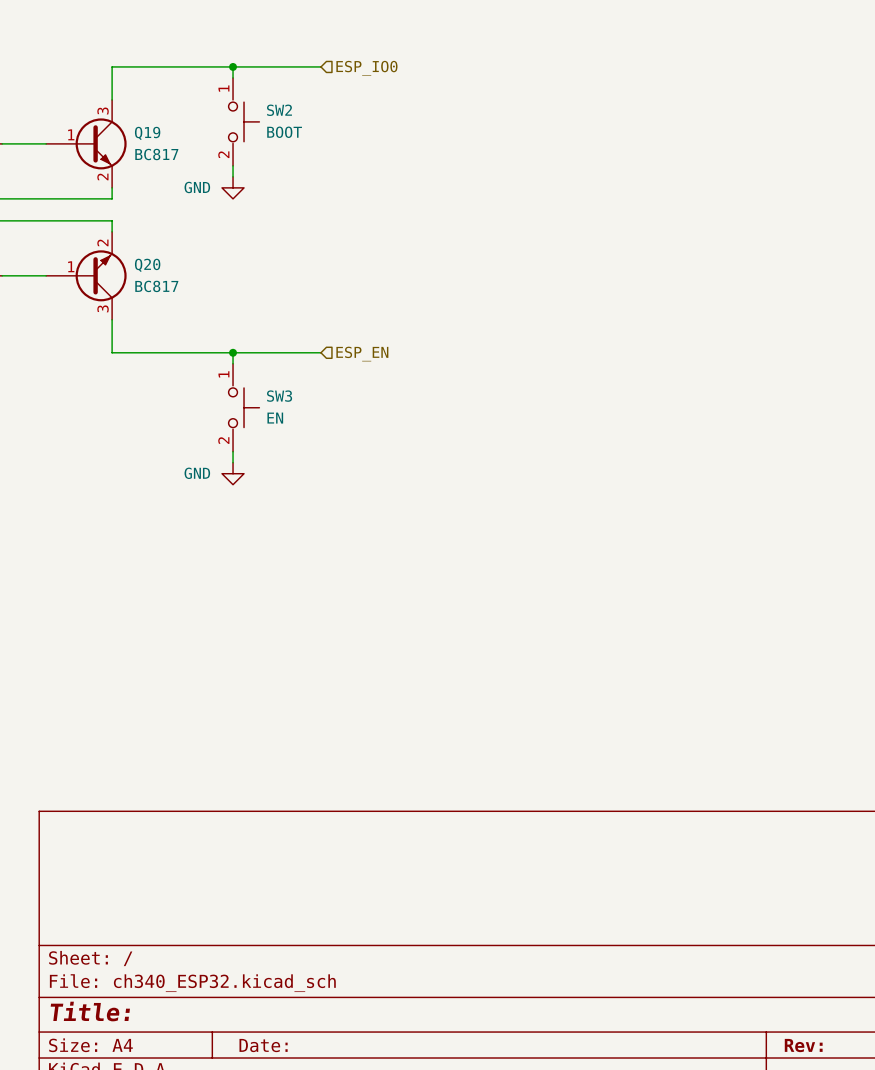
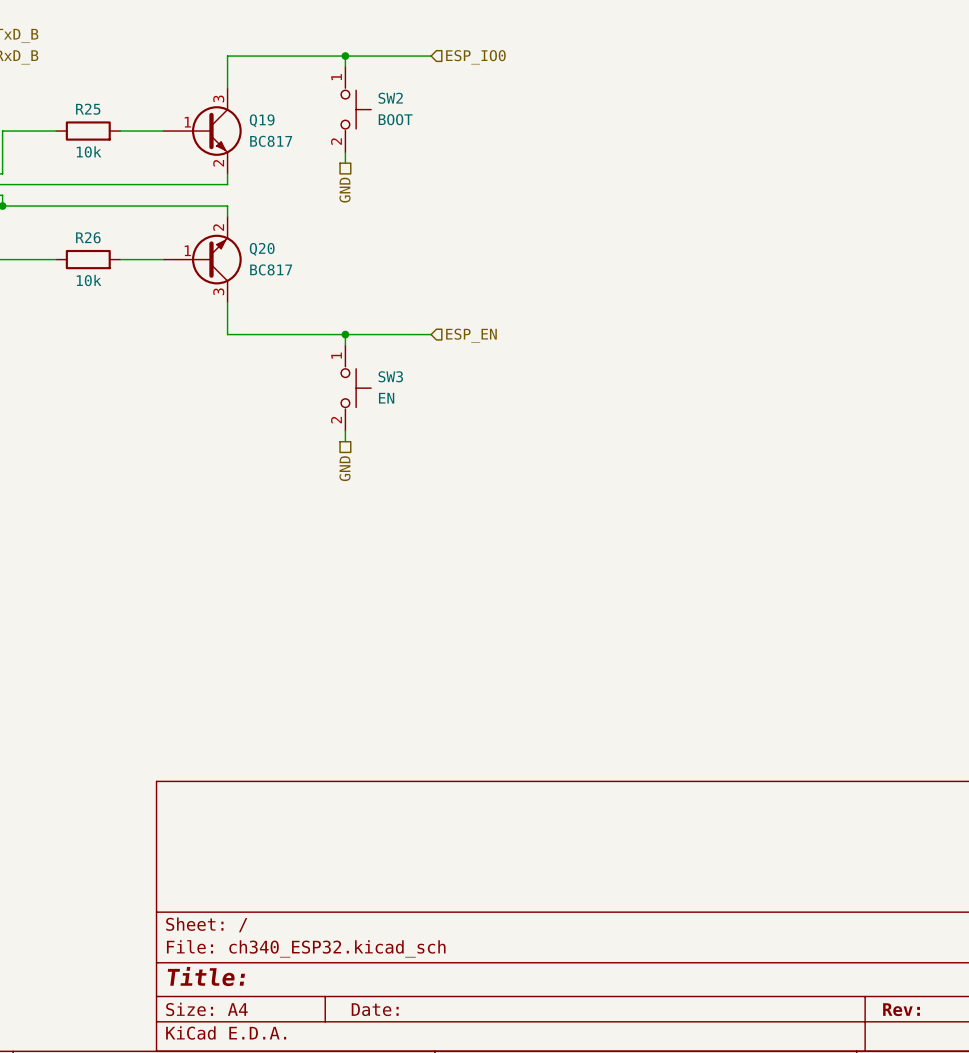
power symbol: GND (233, 187) -> none
hierarchical label: none -> GND (345, 190)
power symbol: GND (233, 473) -> none
hierarchical label: none -> GND (345, 468)

